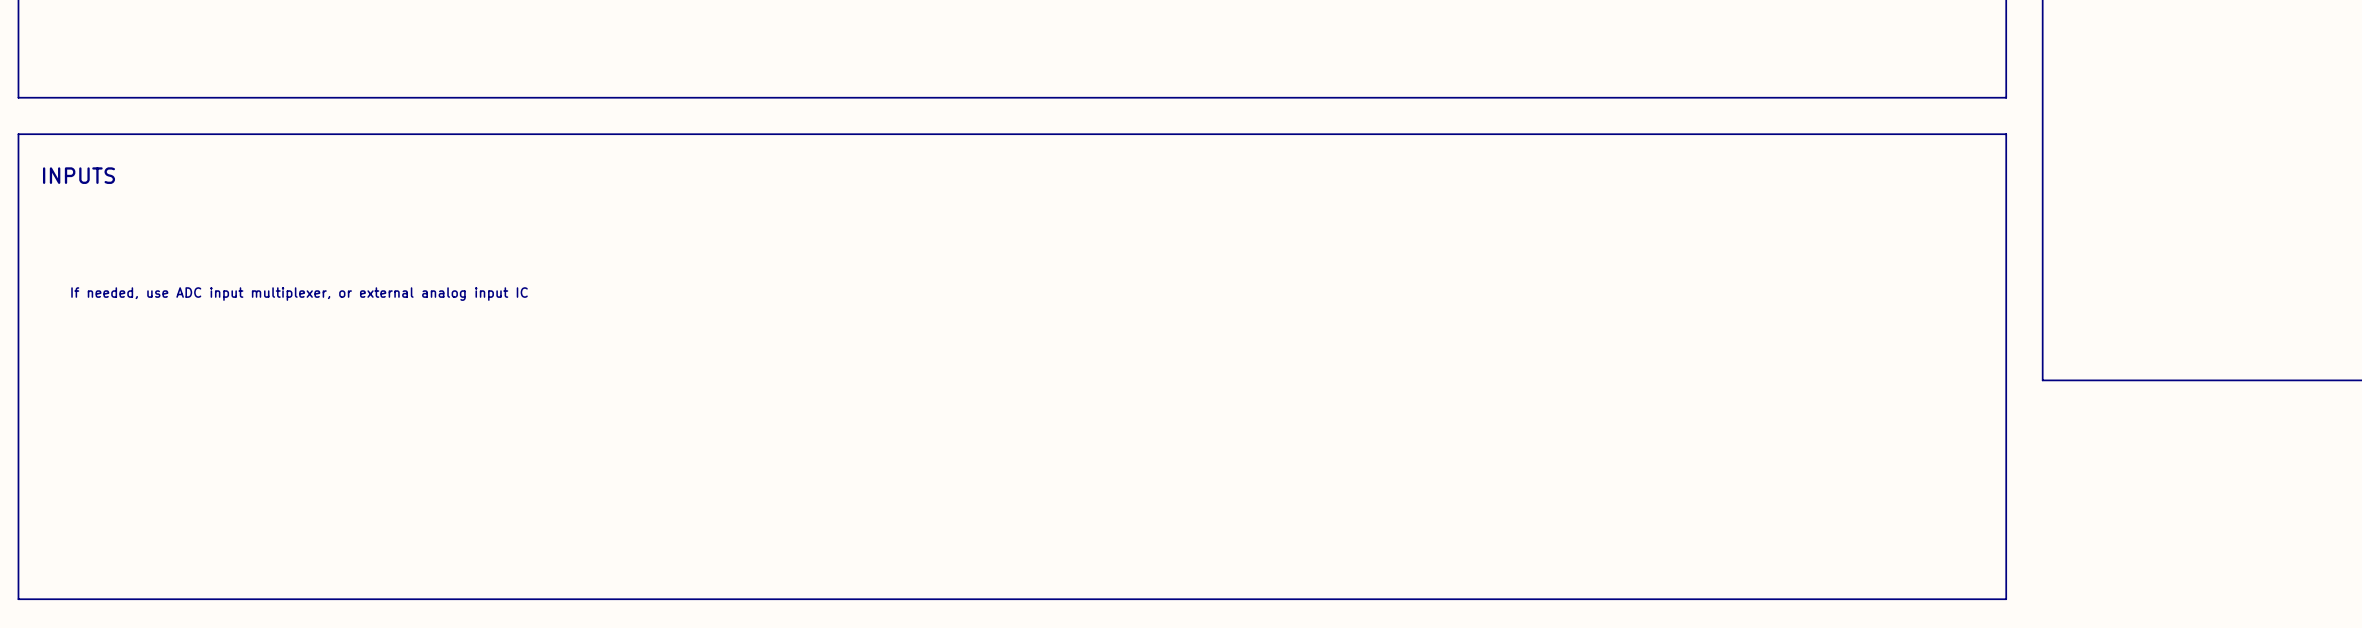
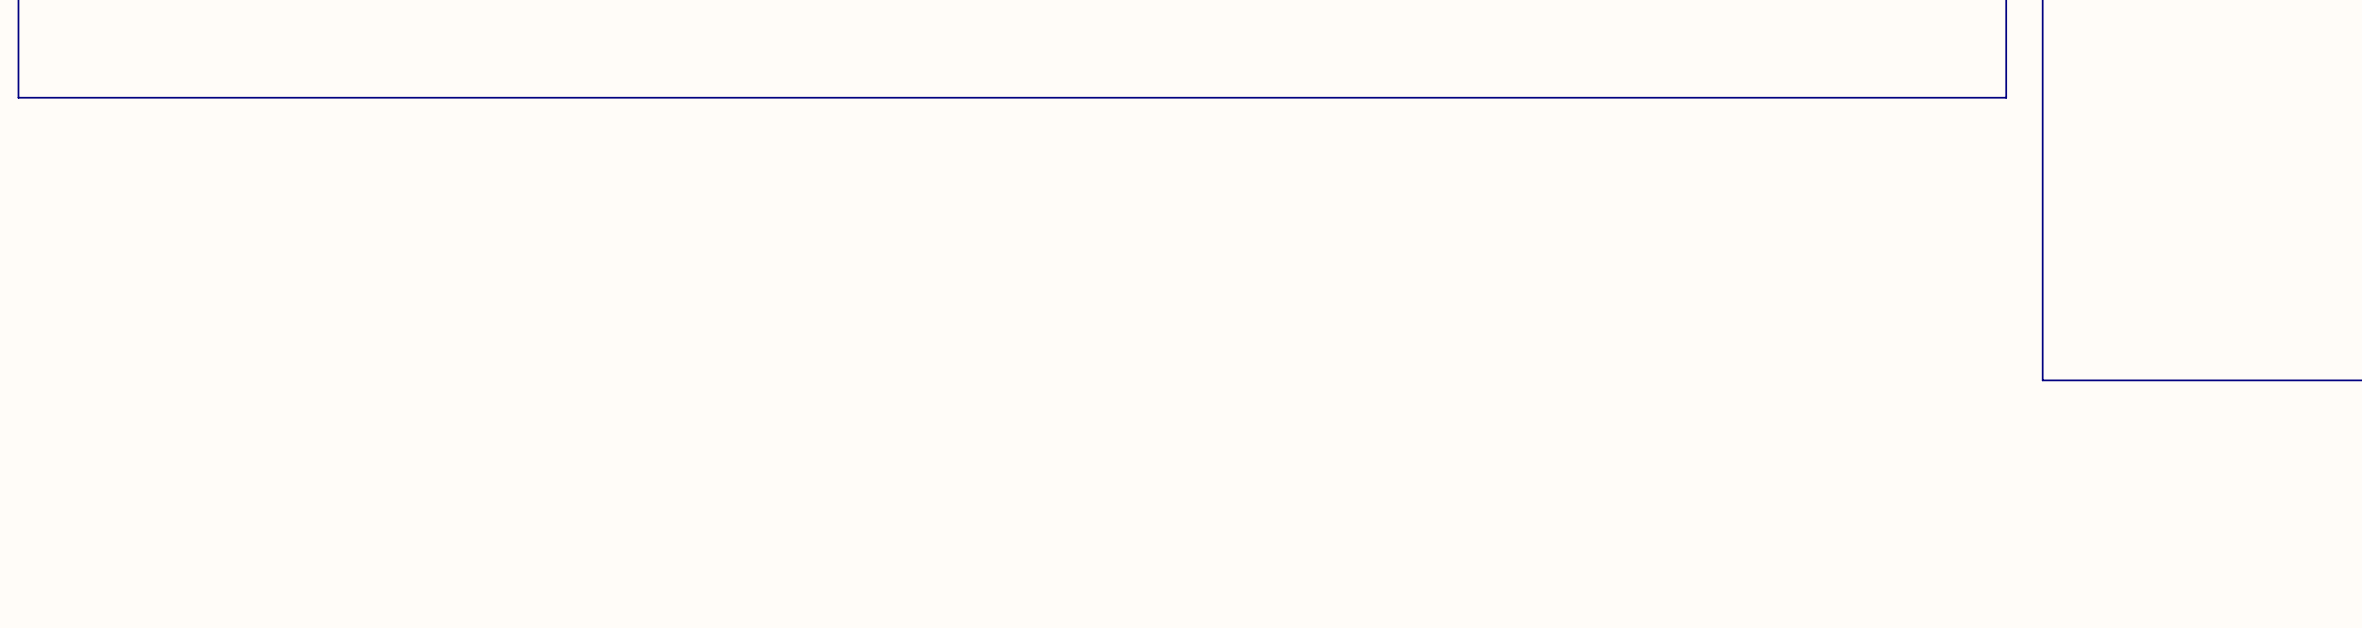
line: (18, 134) (18, 599) (2006, 599) (2006, 134) (18, 134) -> none
text: INPUTS (79, 175) -> none
text: If needed, use ADC input multiplexer, or external analog input IC (299, 294) -> none

